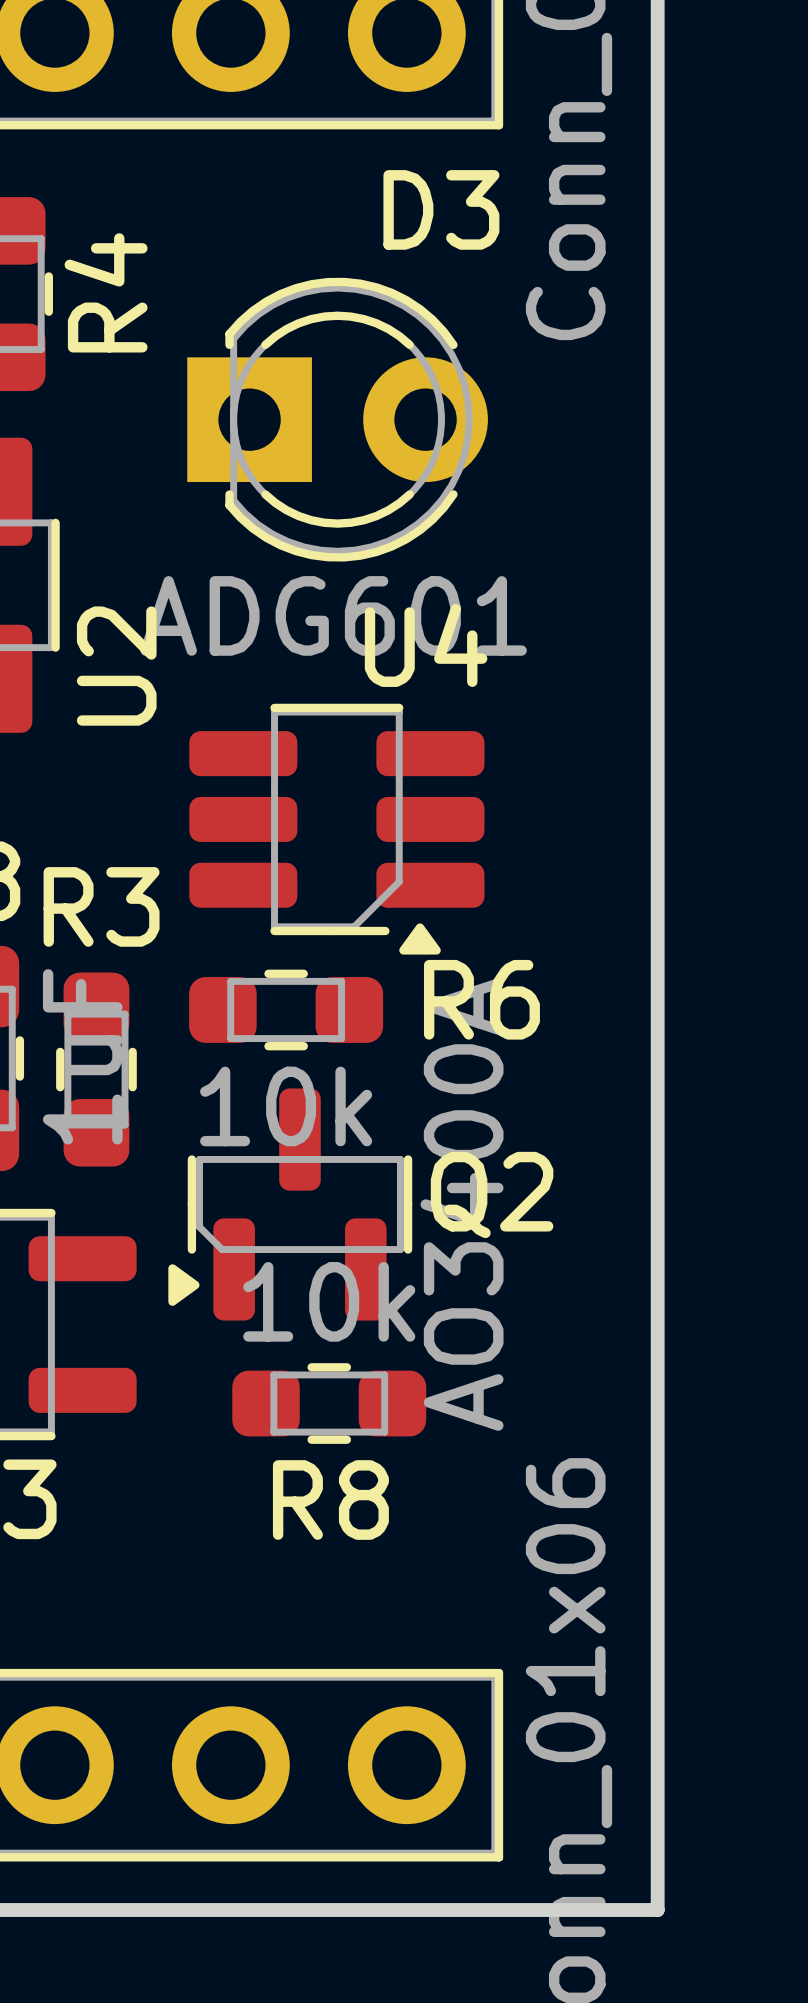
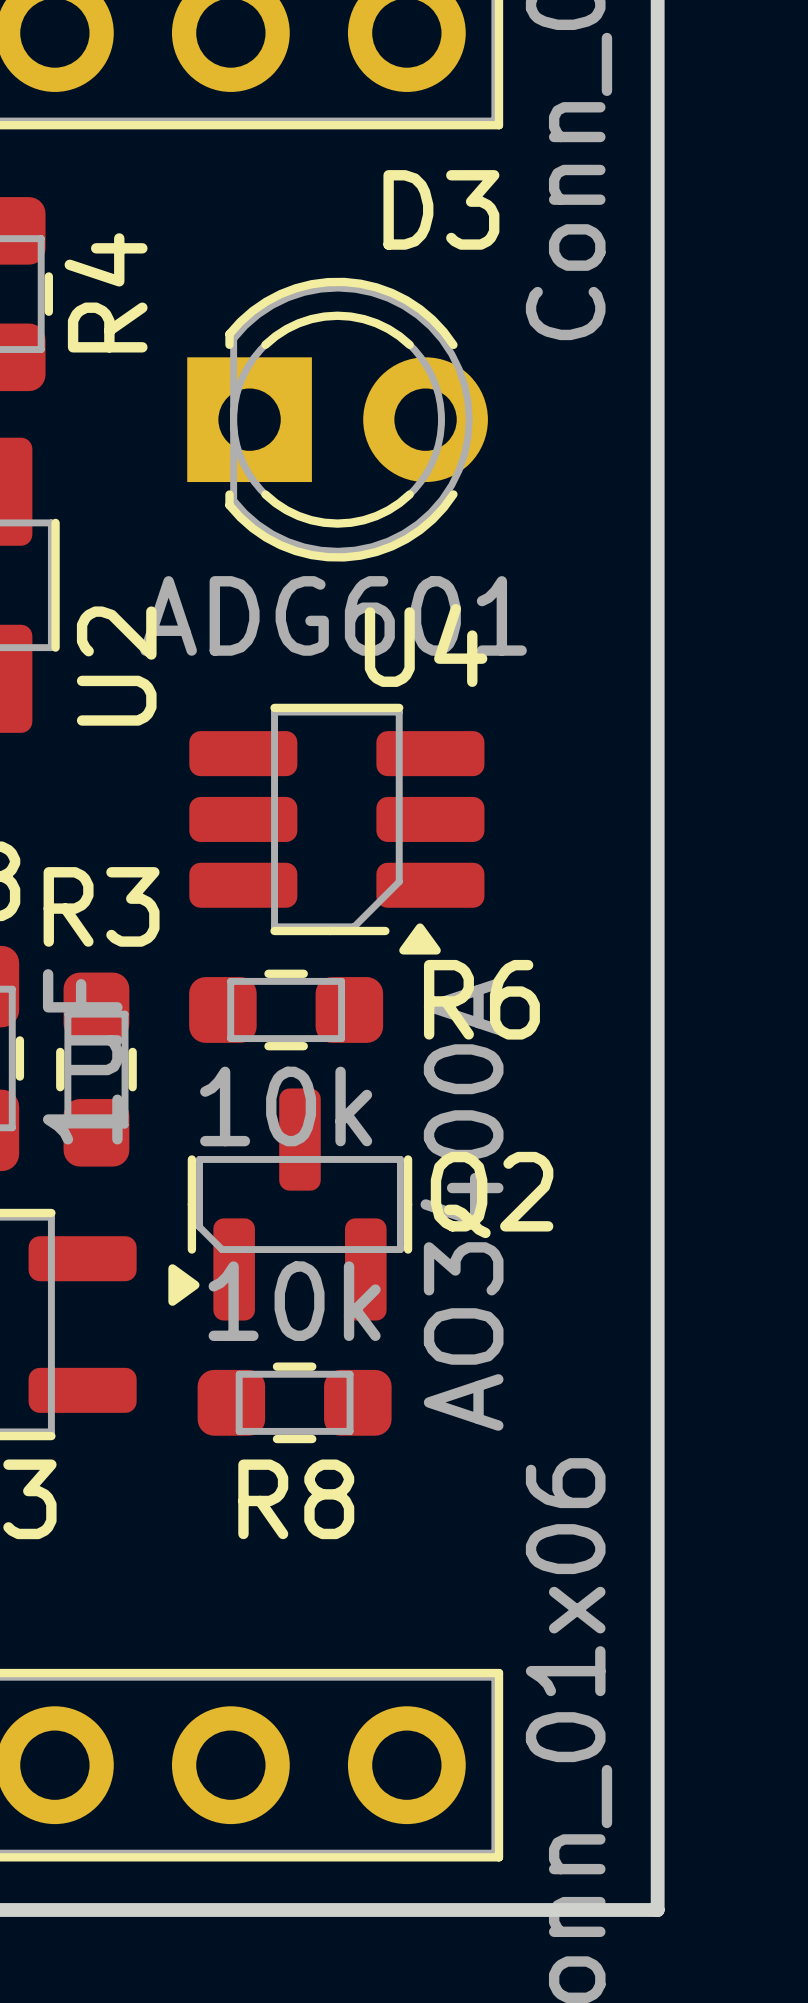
R8 position: (329, 1403) -> (294, 1402)

